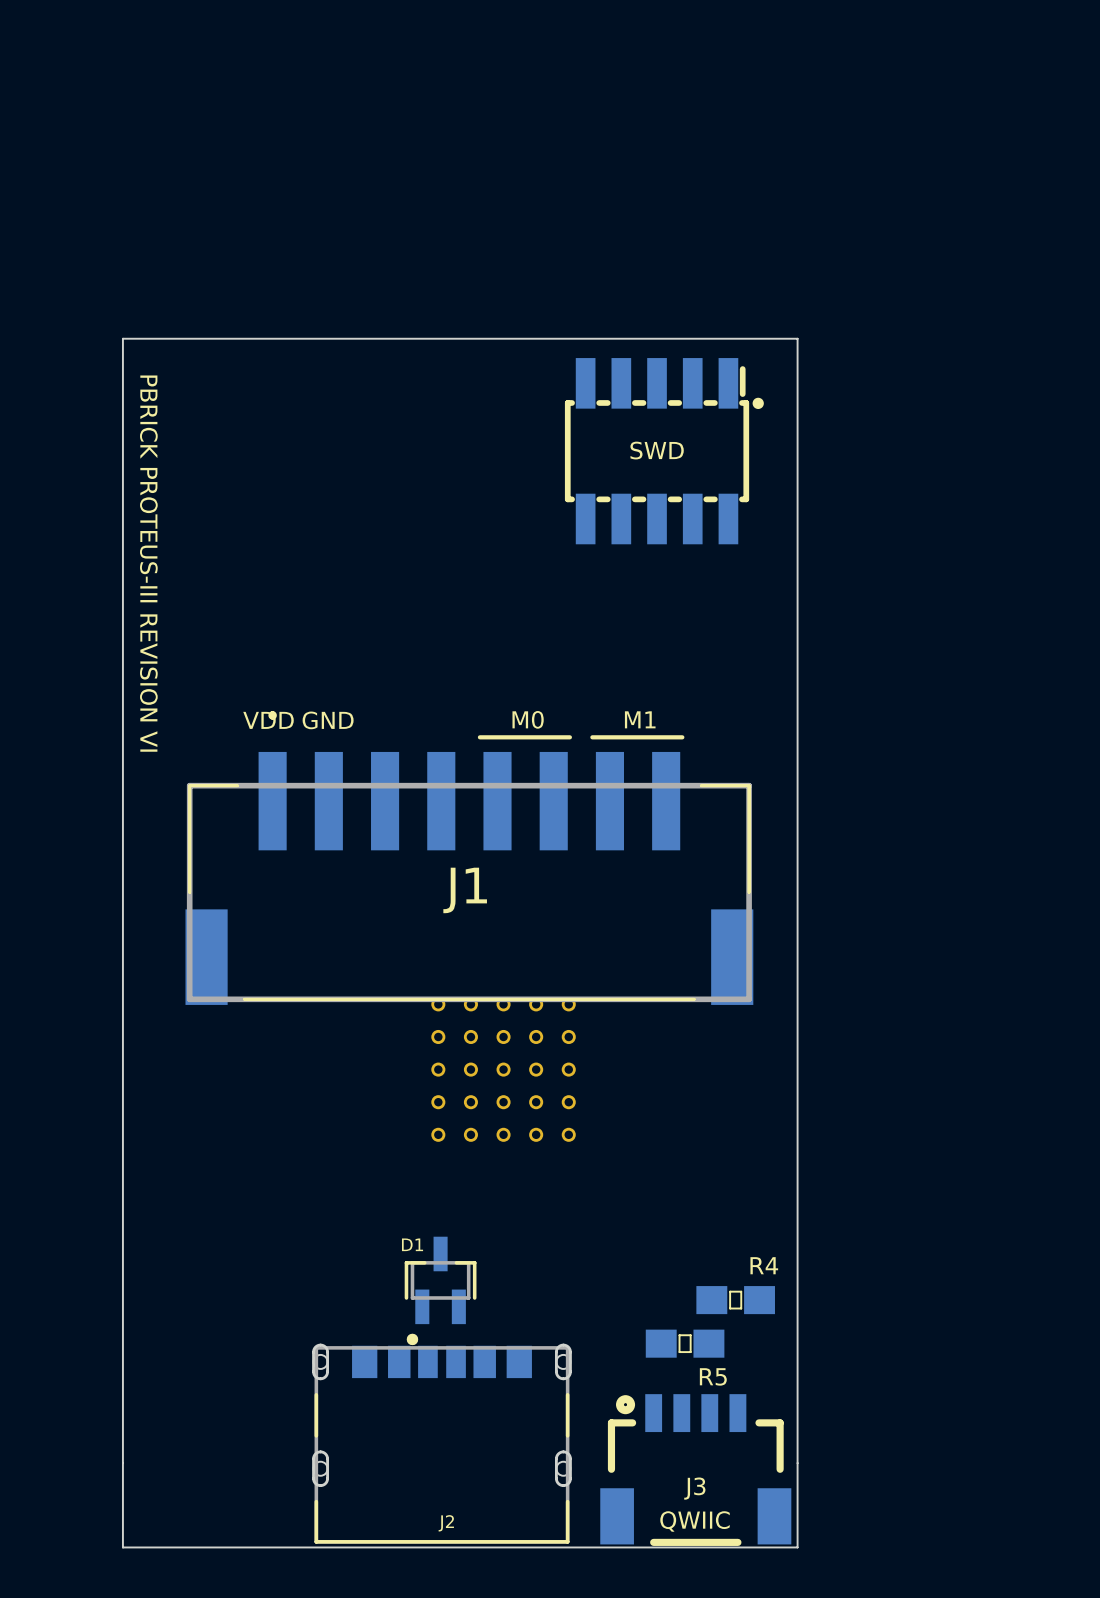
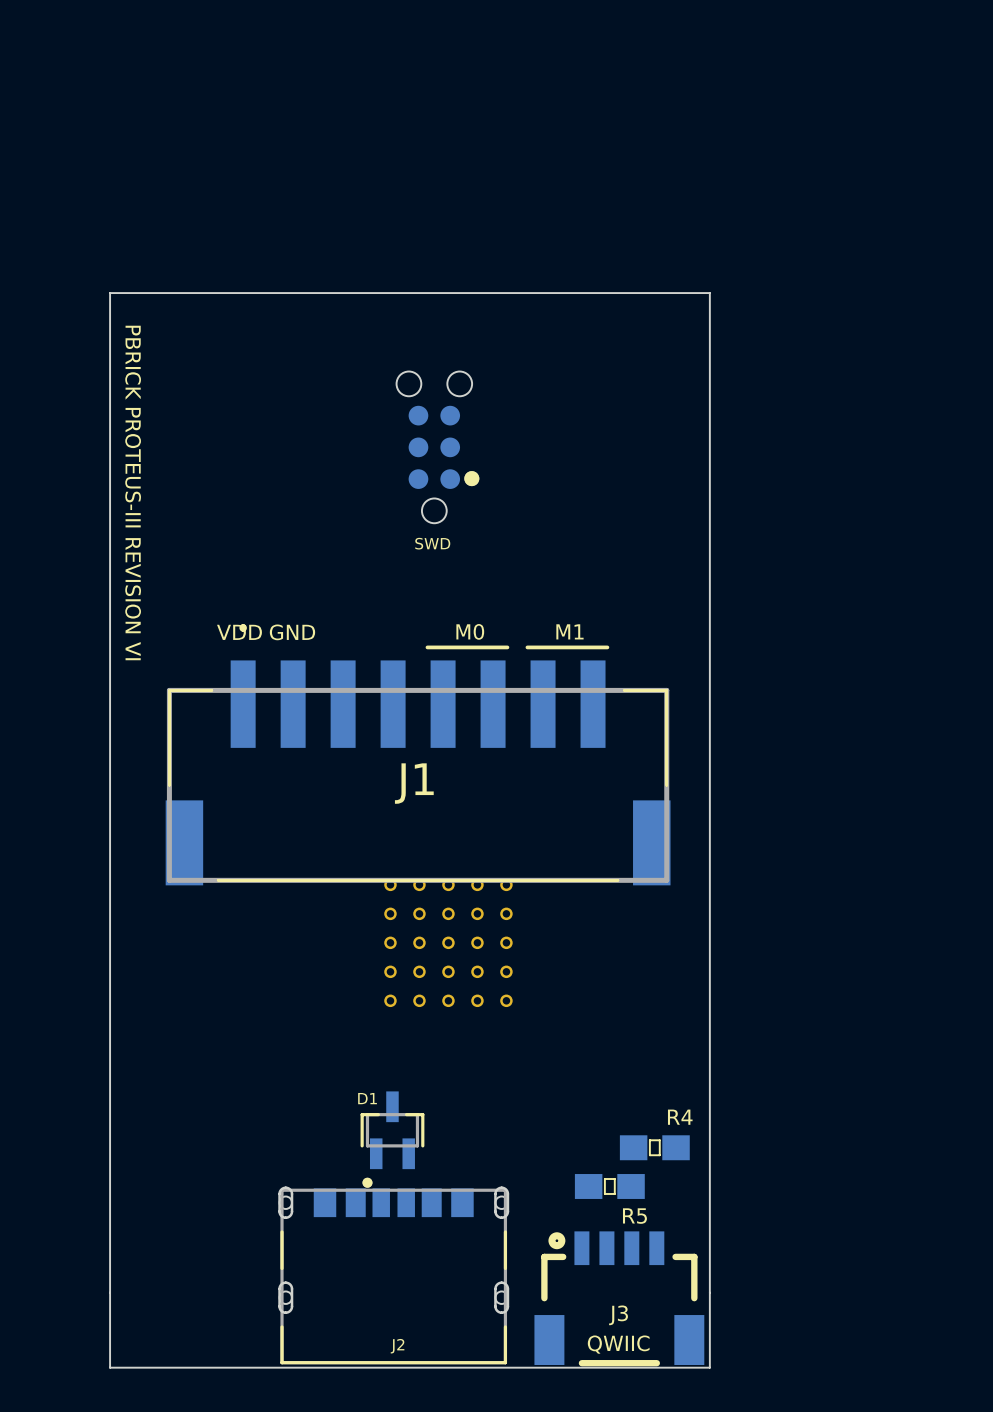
drawing: [752, 397, 764, 410] -> none
part: SWD (657, 451) -> none
SWD: none -> (437, 447)

